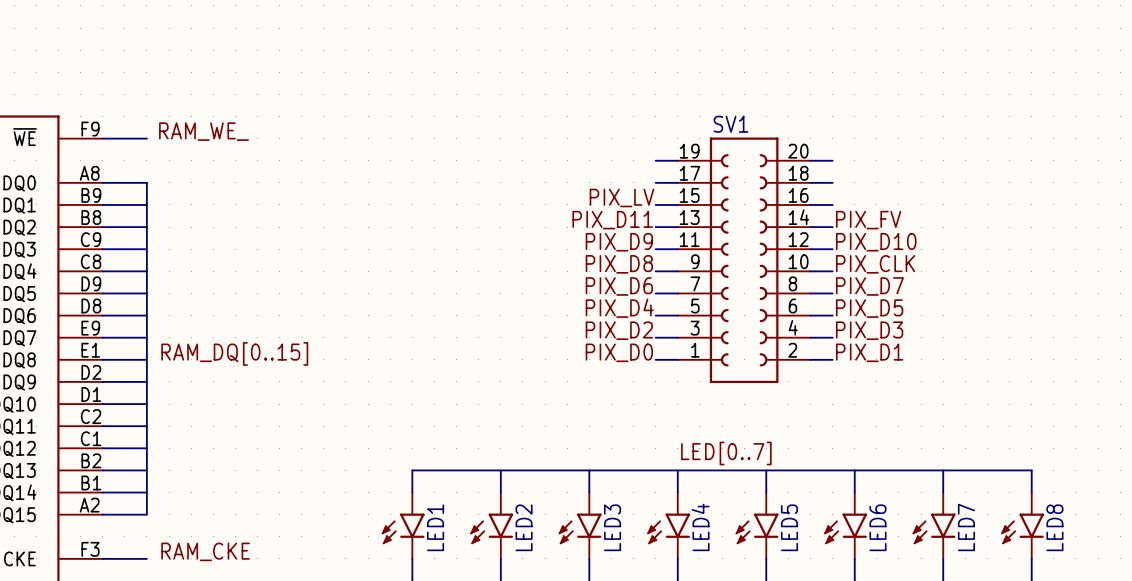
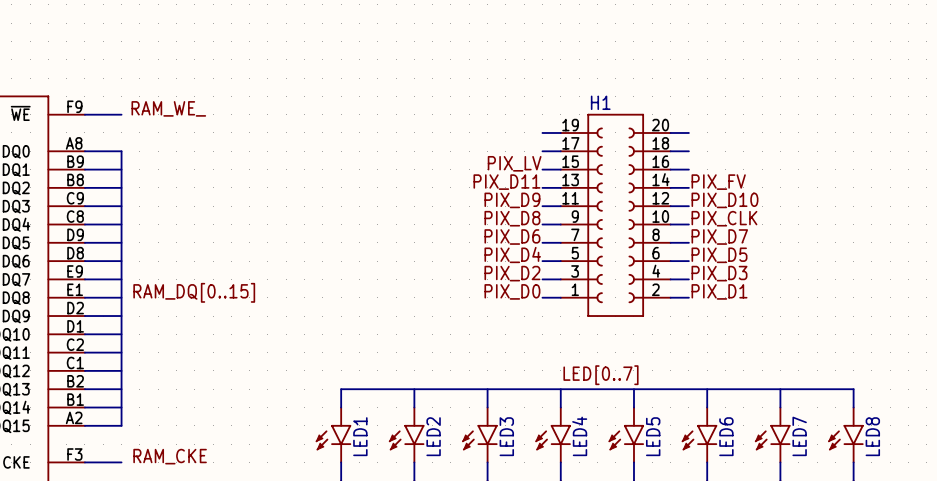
SV1 name: SV1 (731, 124) -> H1 (600, 102)

